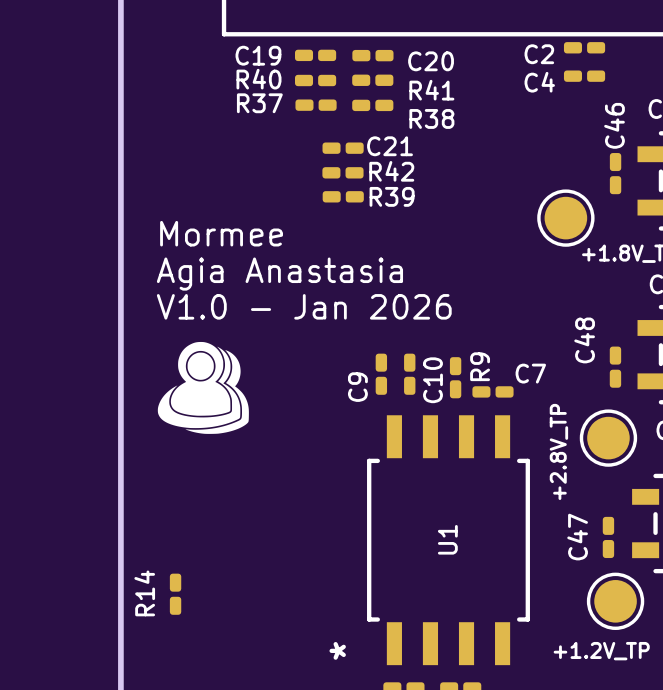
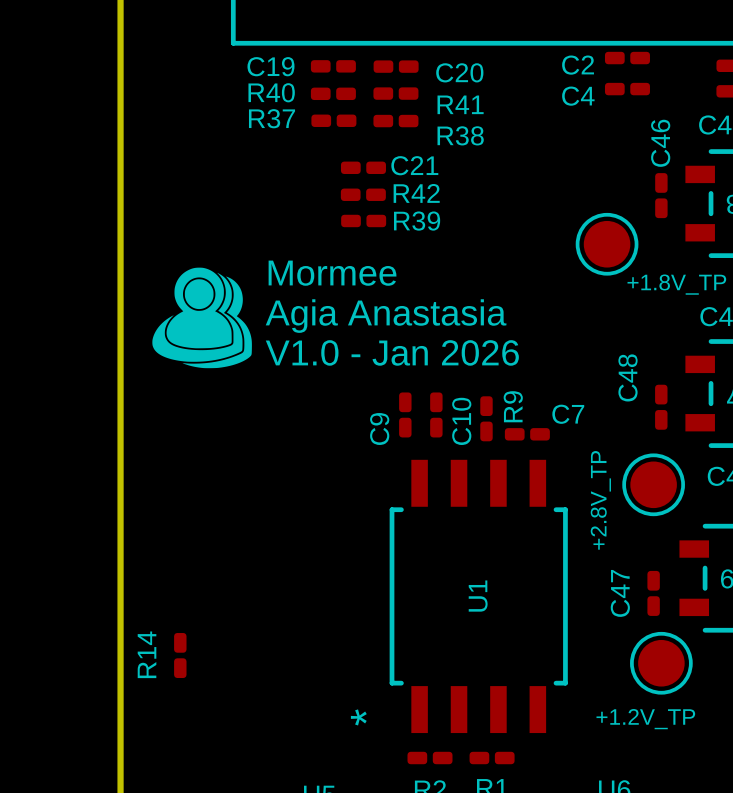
text position: Mormee (221, 233) -> Mormee (332, 273)
text position: Agia Anastasia (279, 274) -> Agia Anastasia (386, 316)
text position: V1.0 - Jan 2026 (304, 306) -> V1.0 - Jan 2026 (392, 352)
drawing position: (200, 366) -> (199, 294)
drawing position: (200, 378) -> (199, 307)
drawing position: (199, 387) -> (197, 317)
drawing position: (217, 391) -> (217, 322)

